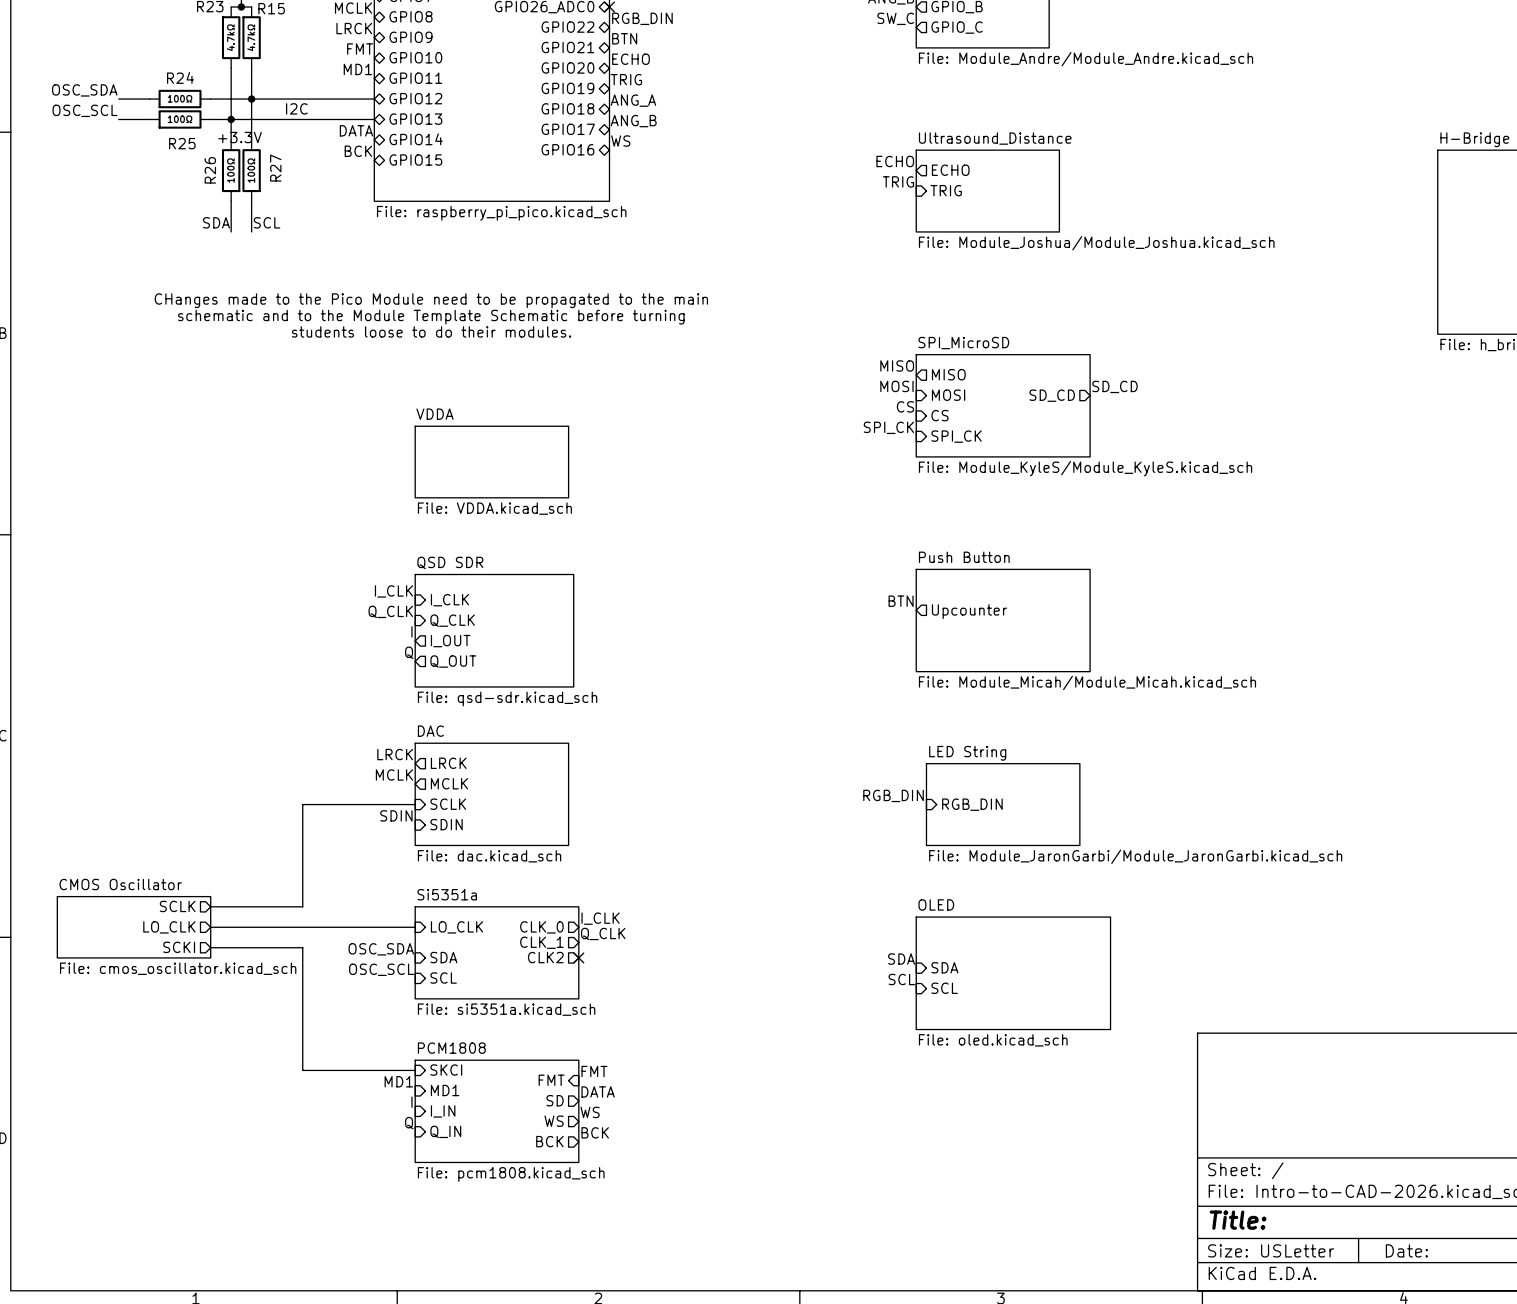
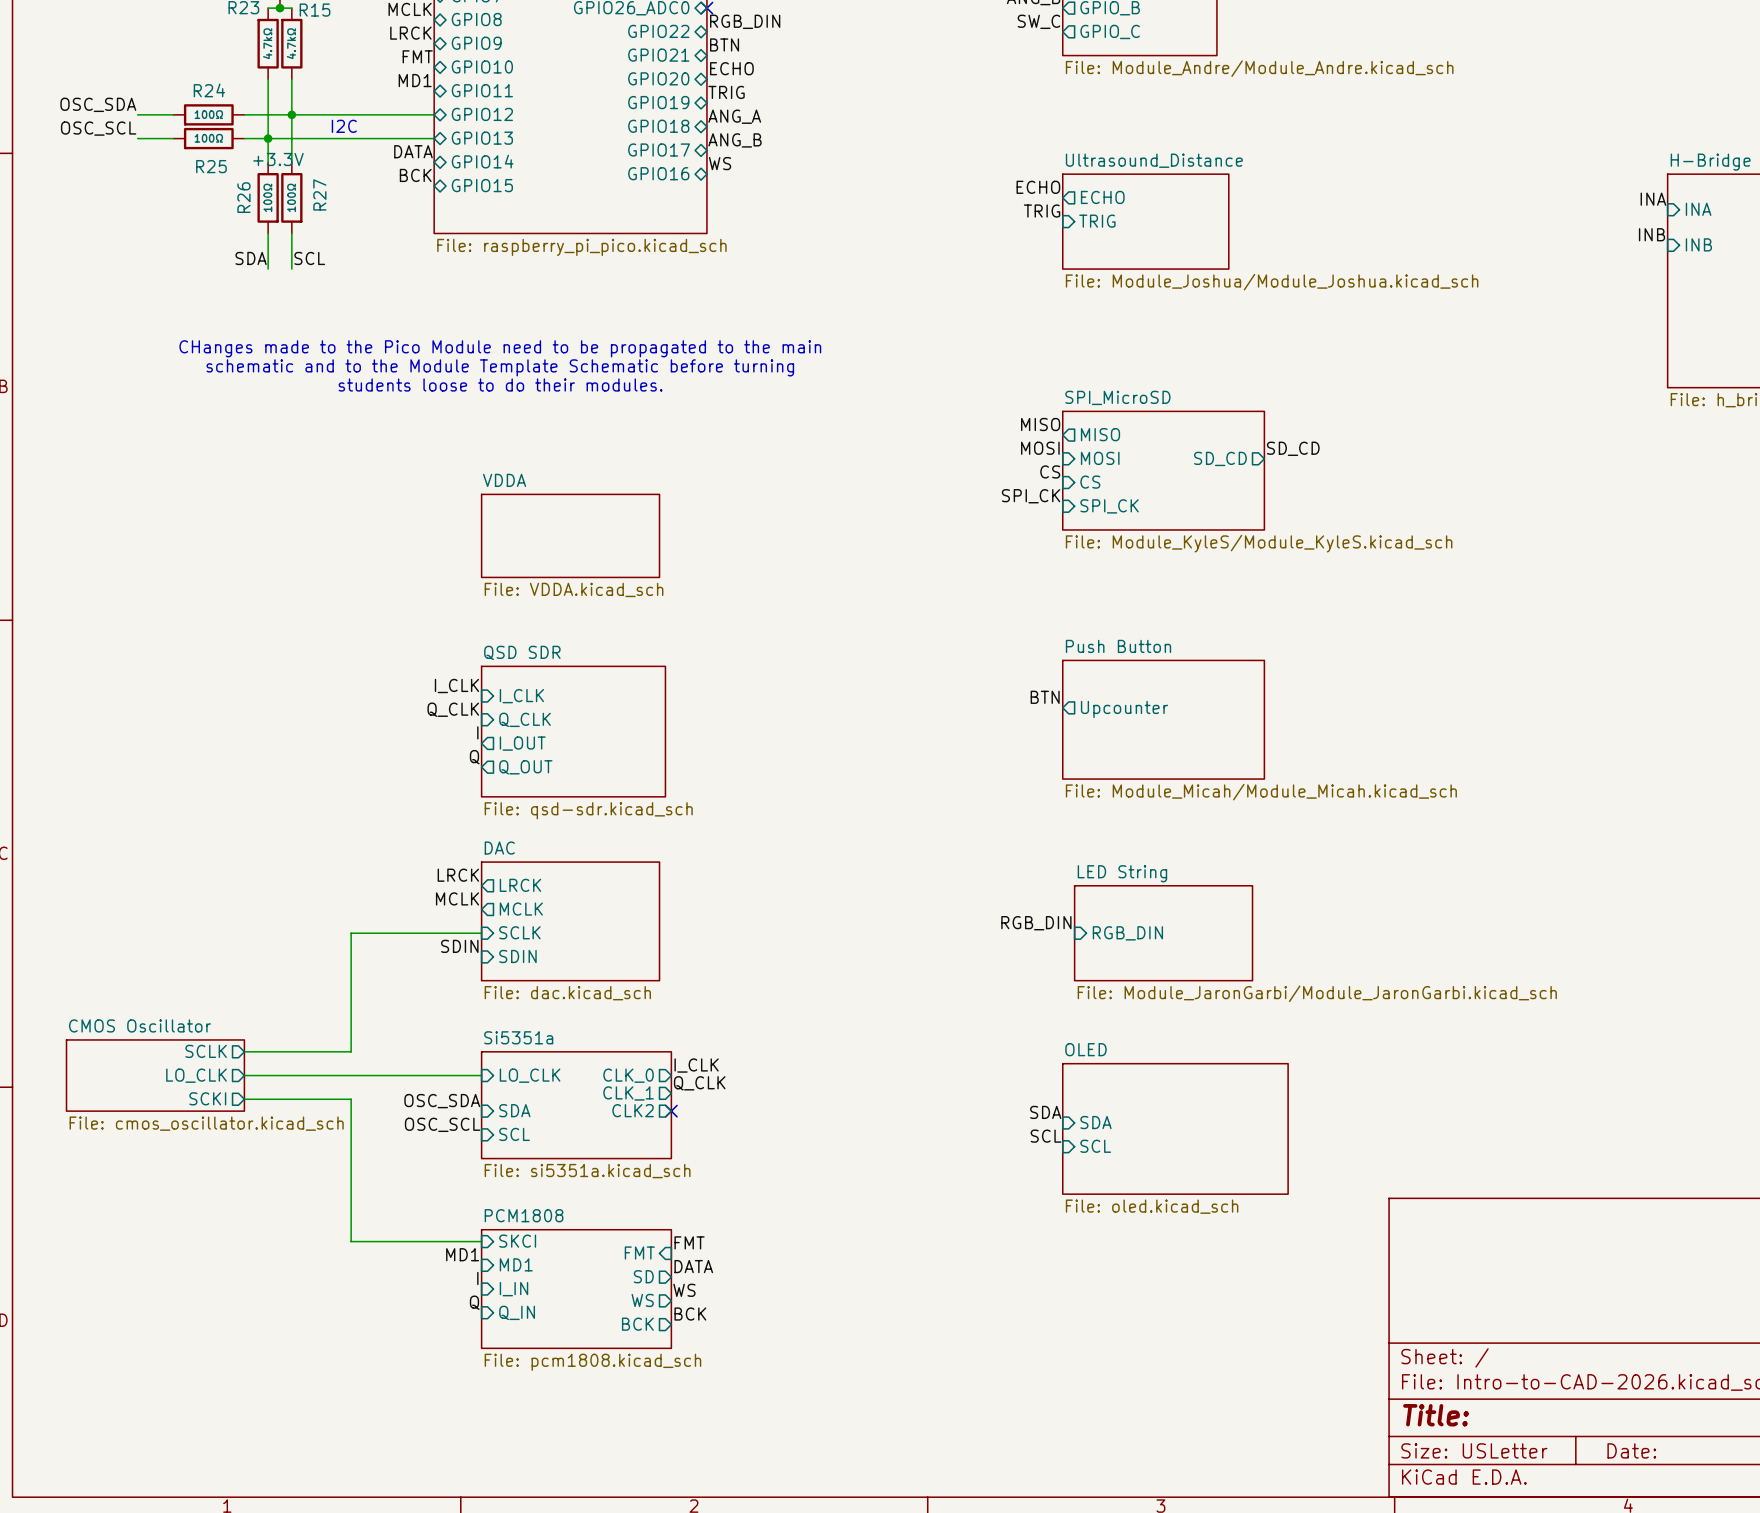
label: none -> INA (1653, 199)
sheet pin: none -> INA (1698, 209)
label: none -> INB (1652, 234)
sheet pin: none -> INB (1698, 244)

